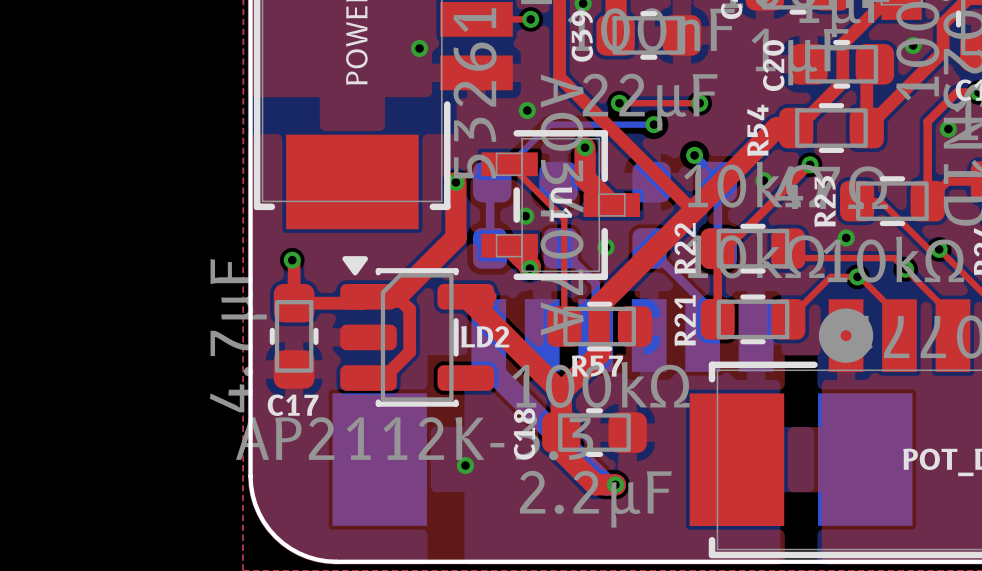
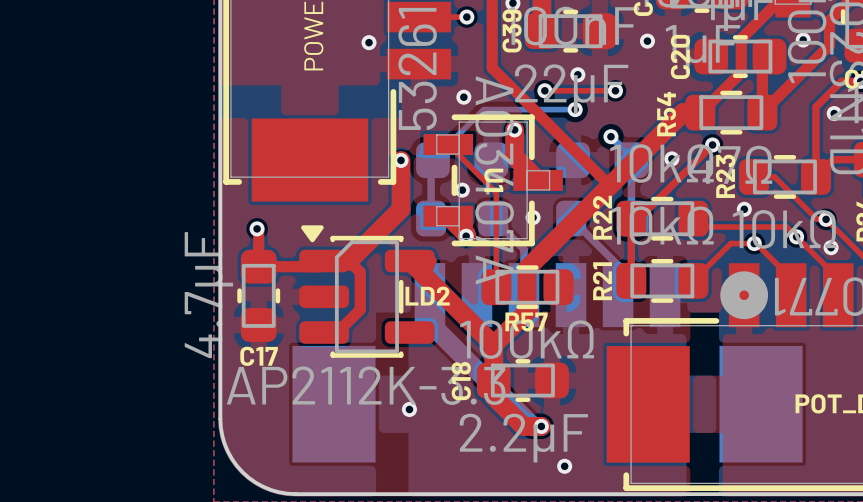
via: none -> (647, 41)
via: none -> (577, 74)
via: none -> (831, 247)
via: none -> (564, 466)

